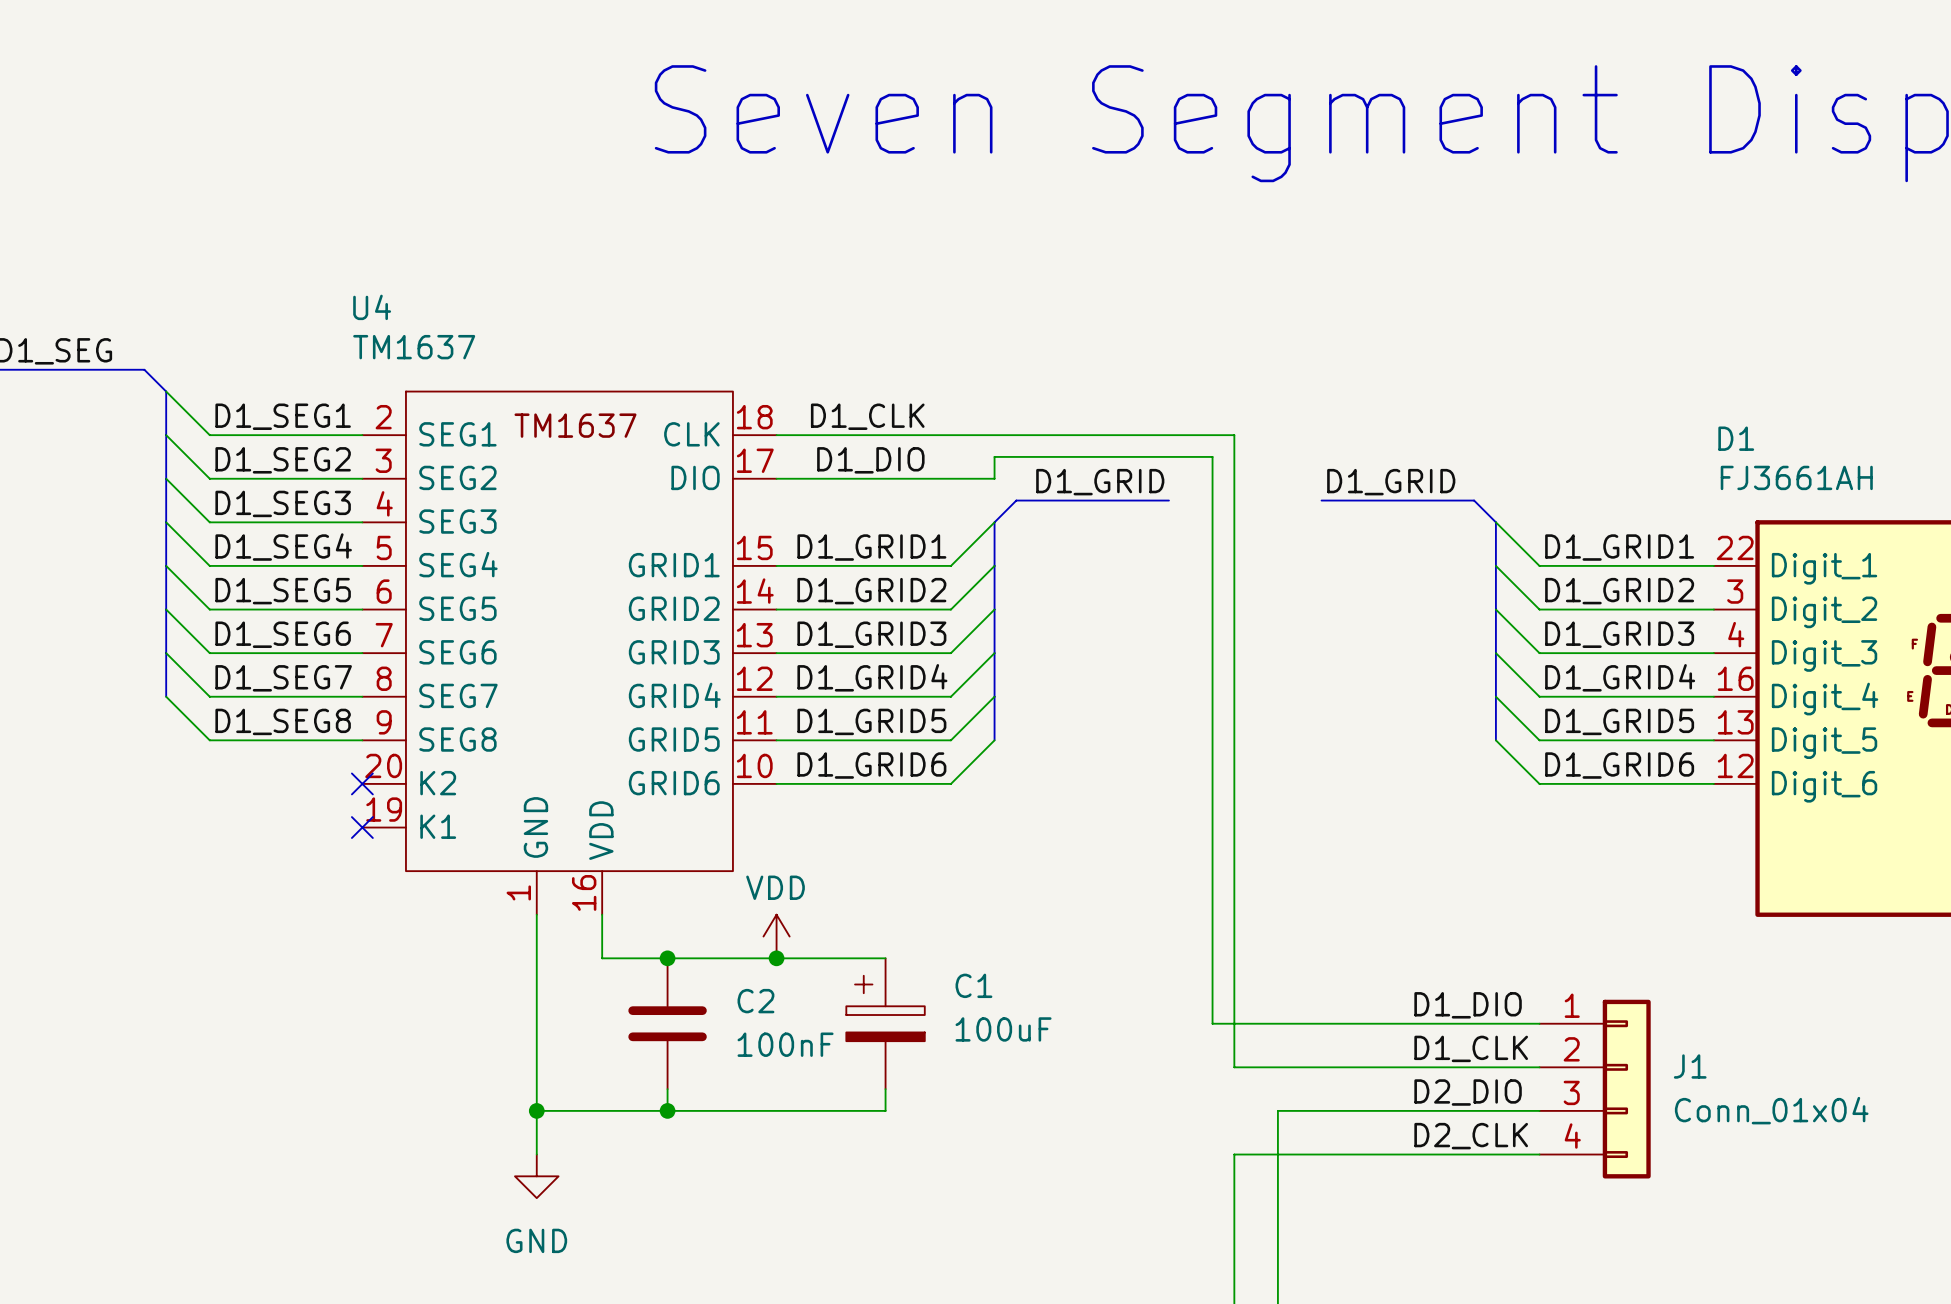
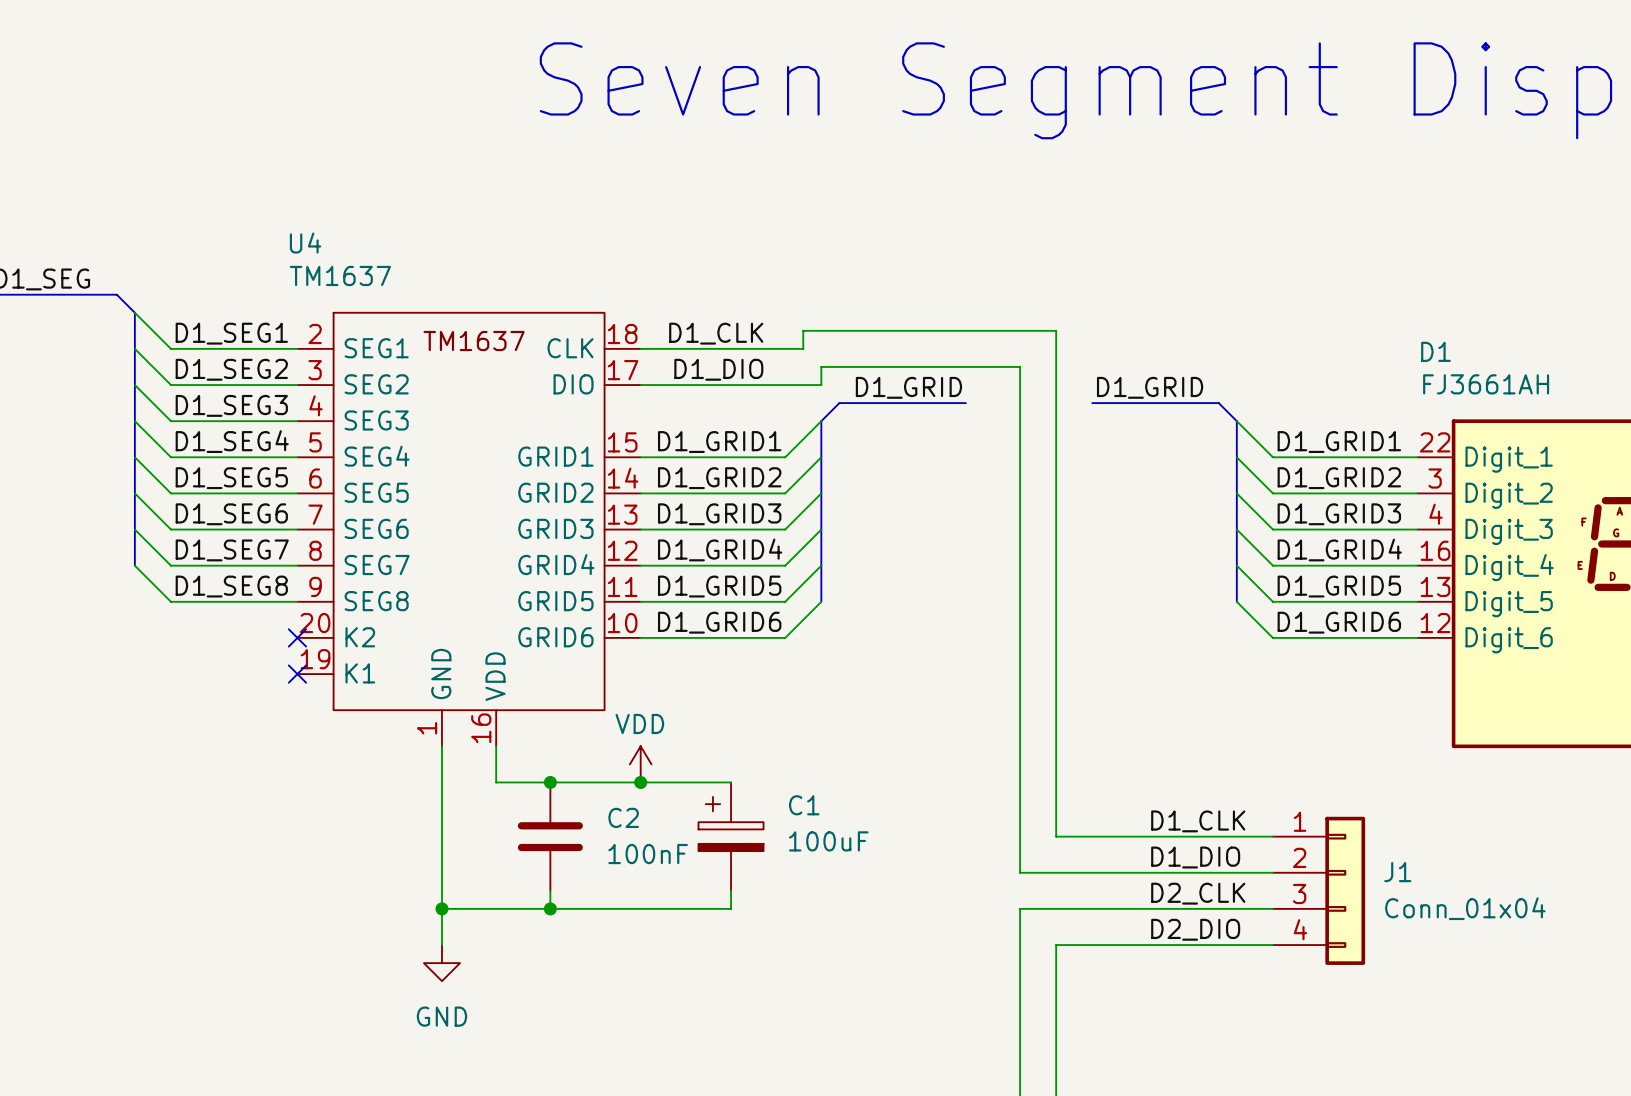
wire: (972, 435) (1234, 435) (1234, 456) -> (1001, 366) (1020, 366)
wire: (1212, 456) (1212, 1023) (1277, 1023) -> (803, 348) (803, 330) (1056, 330) (1056, 836)
label position: D1_DIO (1468, 1005) -> D1_DIO (1195, 857)
label position: D1_CLK (1471, 1048) -> D1_CLK (1198, 821)
label position: D2_DIO (1468, 1092) -> D2_DIO (1195, 929)
wire: (1277, 1110) (1277, 1154) (1234, 1154) -> (1056, 908) (1020, 908) (1020, 945)
label position: D2_CLK (1471, 1136) -> D2_CLK (1198, 893)

